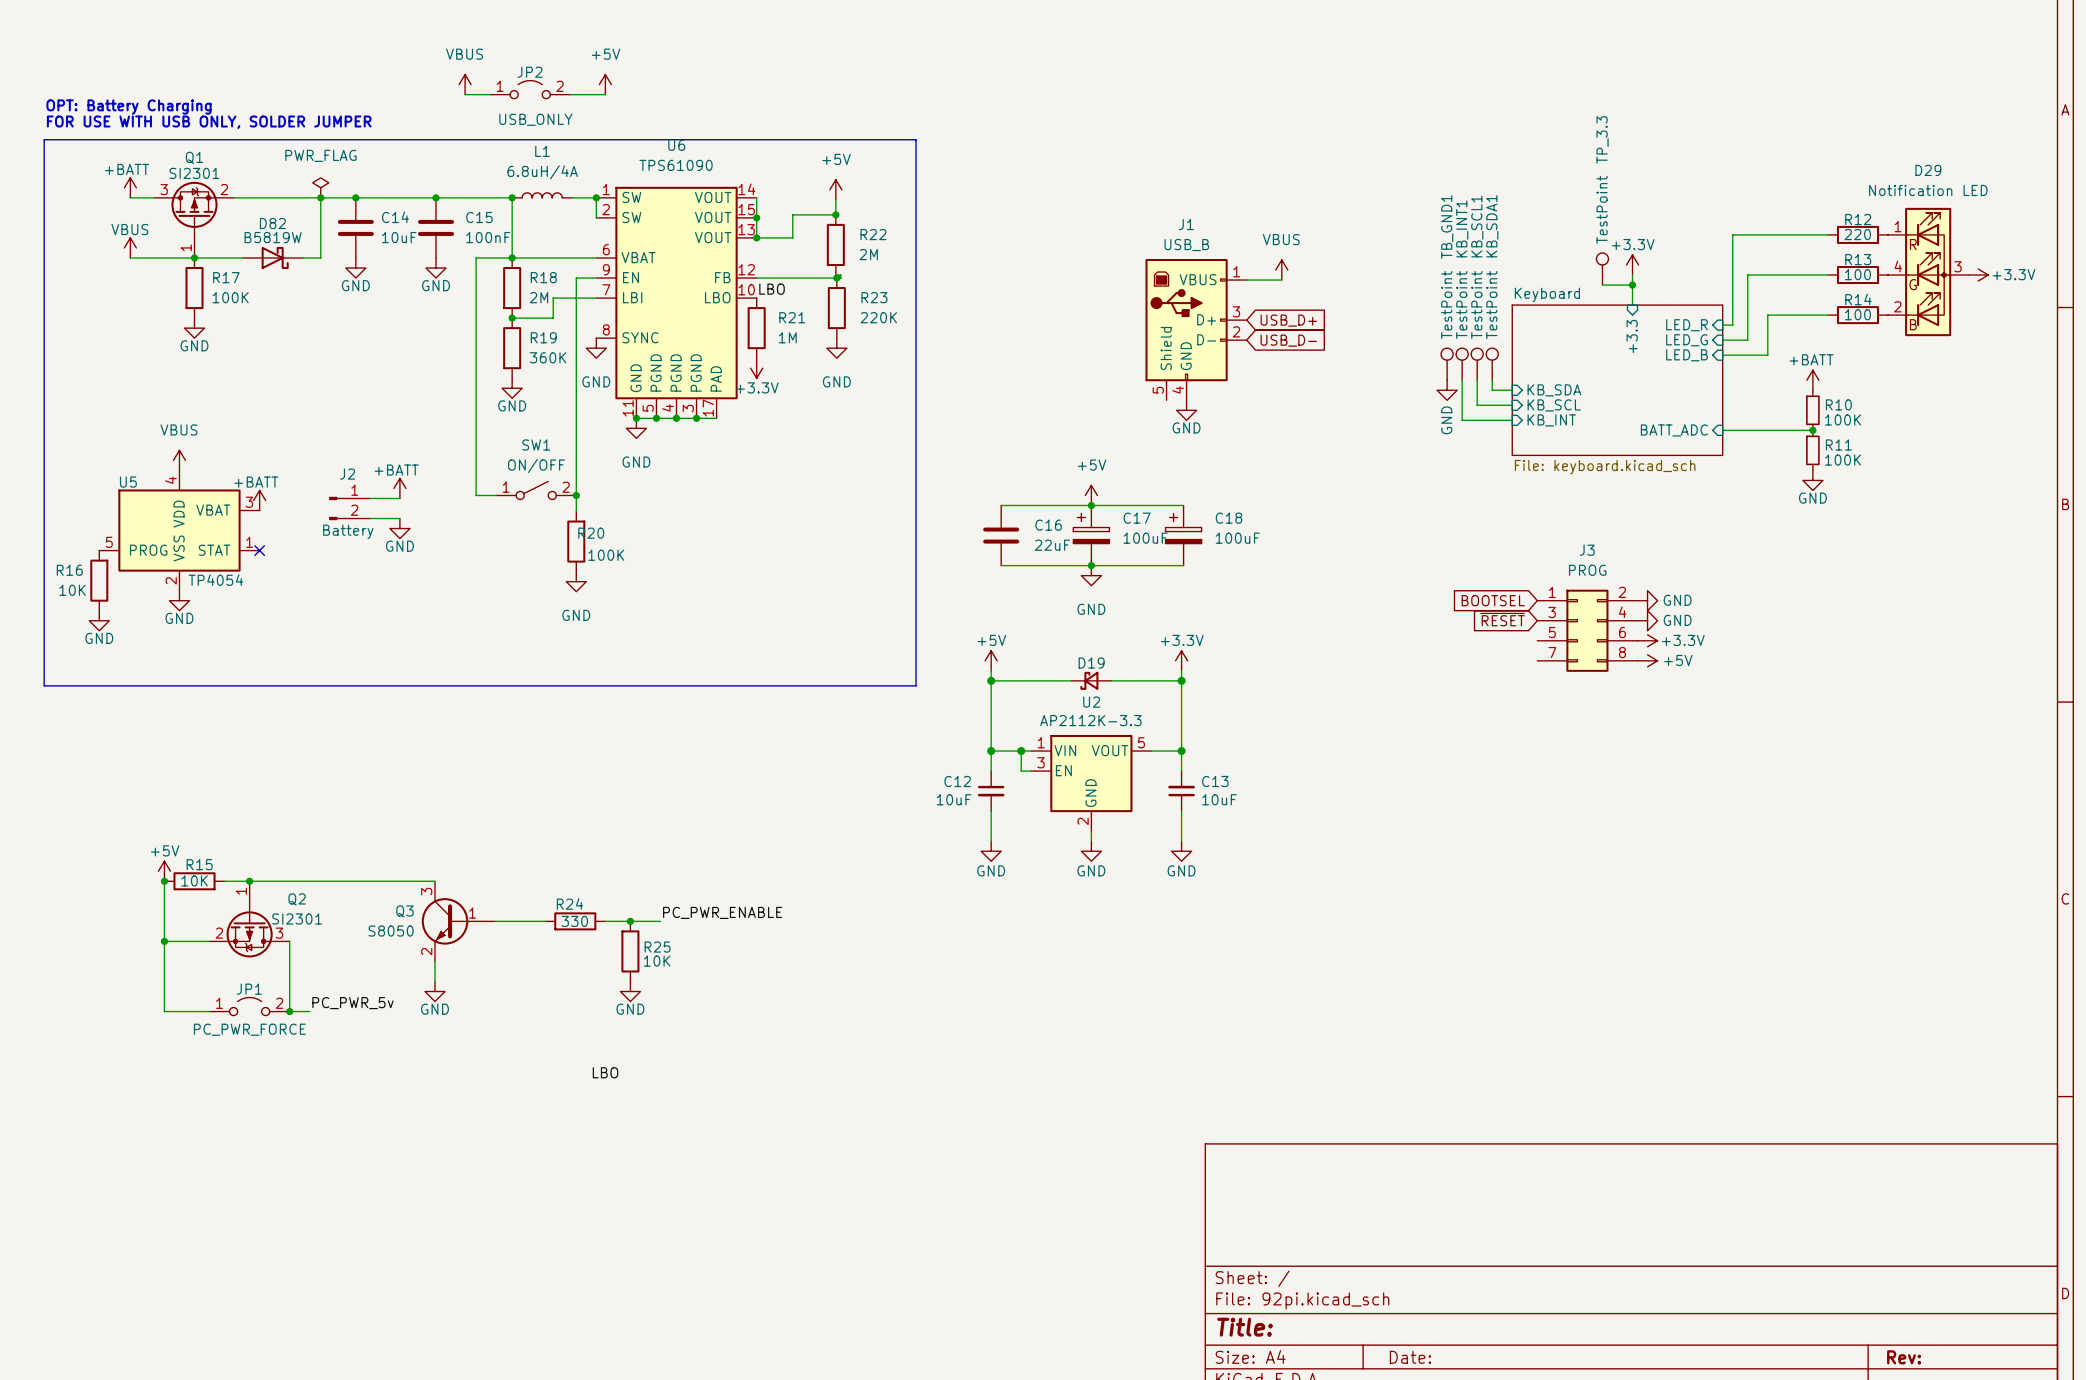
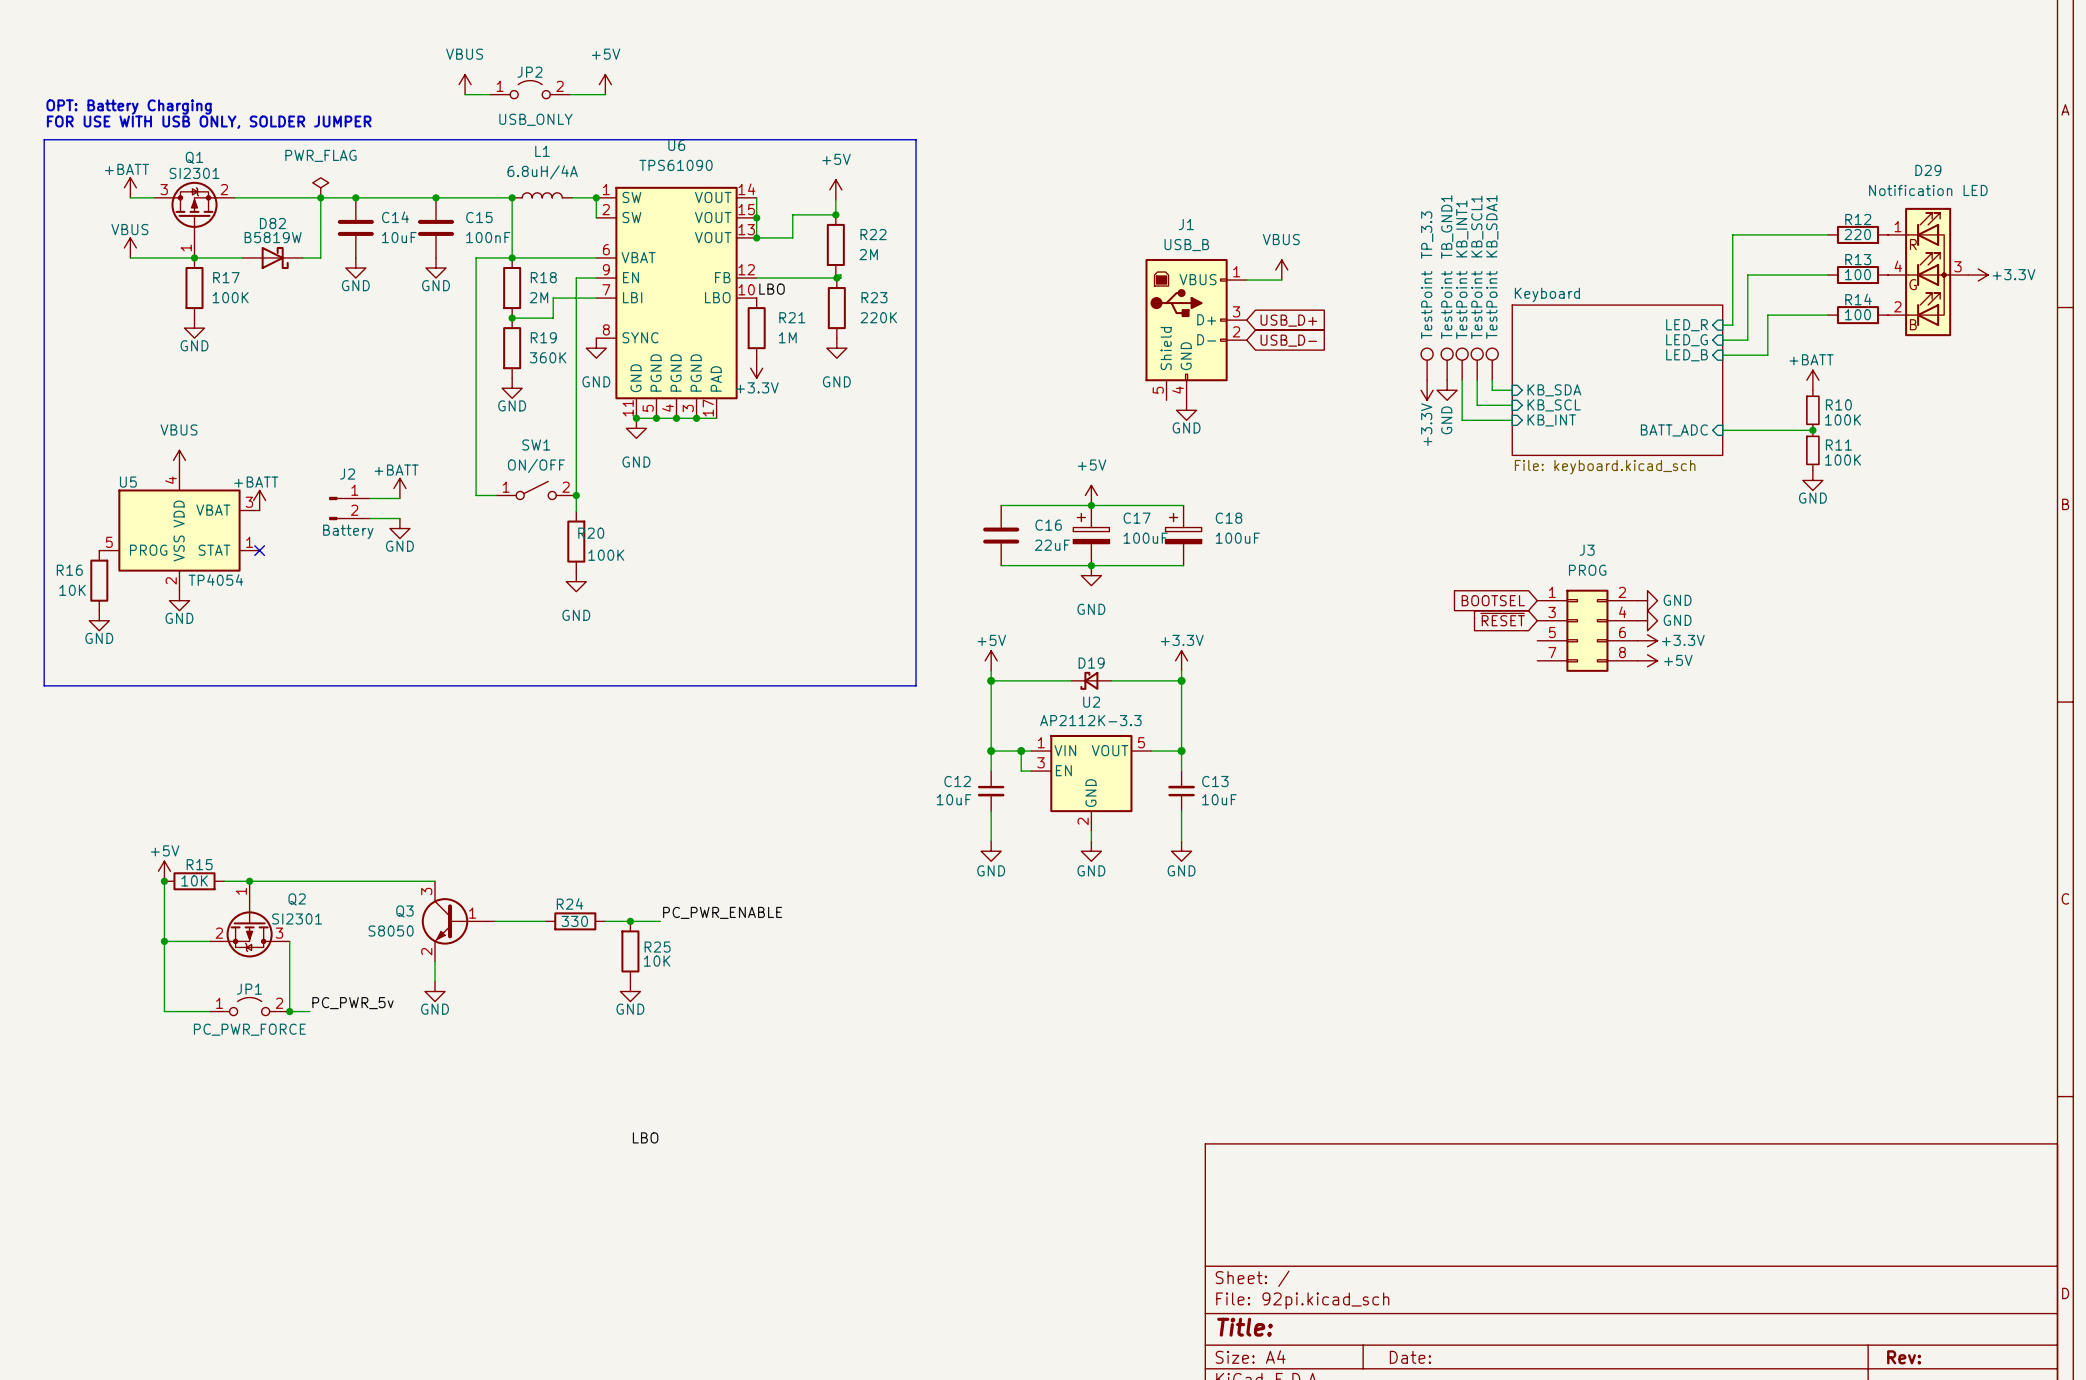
power symbol: +3.3V (1632, 264) -> none
TP_3.3 position: (1602, 269) -> (1427, 364)
wire: (1632, 275) (1632, 305) -> none
wire: (1602, 285) (1632, 285) -> none
junction: (1632, 285) -> none
sheet pin: +3.3 (1632, 336) -> none
power symbol: none -> +3.3V (1427, 390)
label position: LBO (605, 1072) -> LBO (645, 1137)

